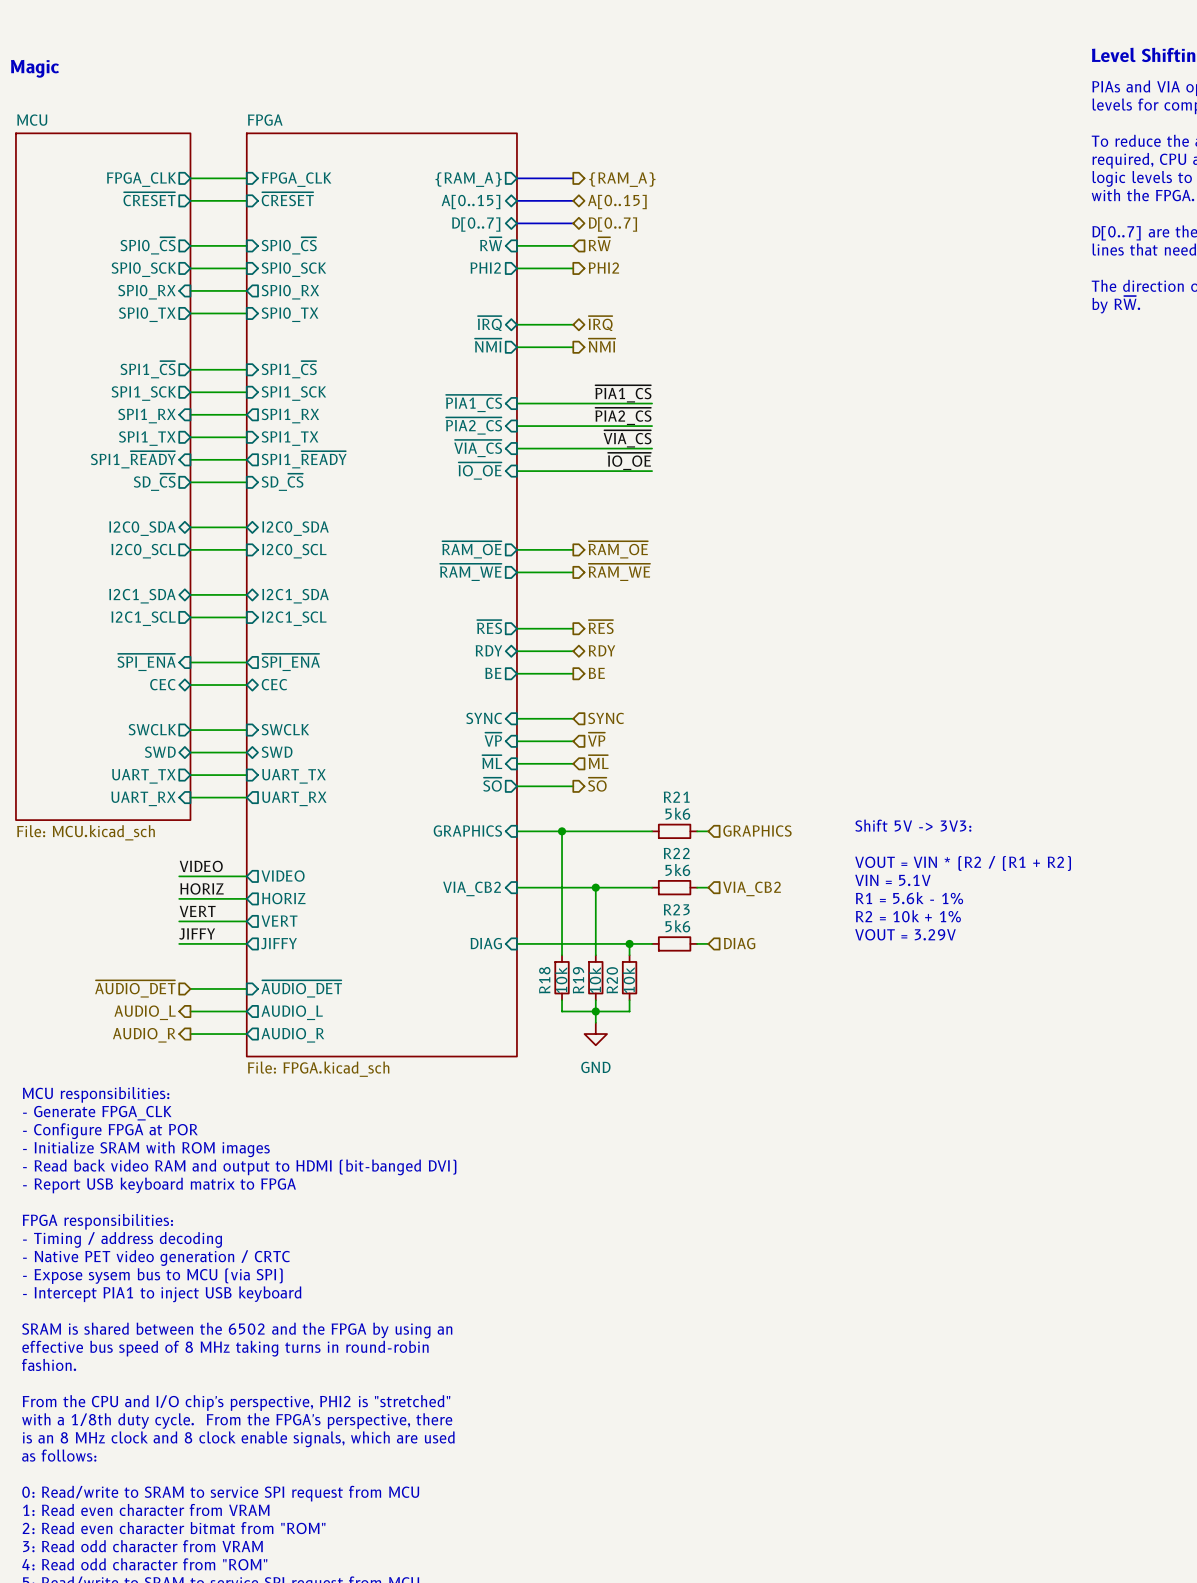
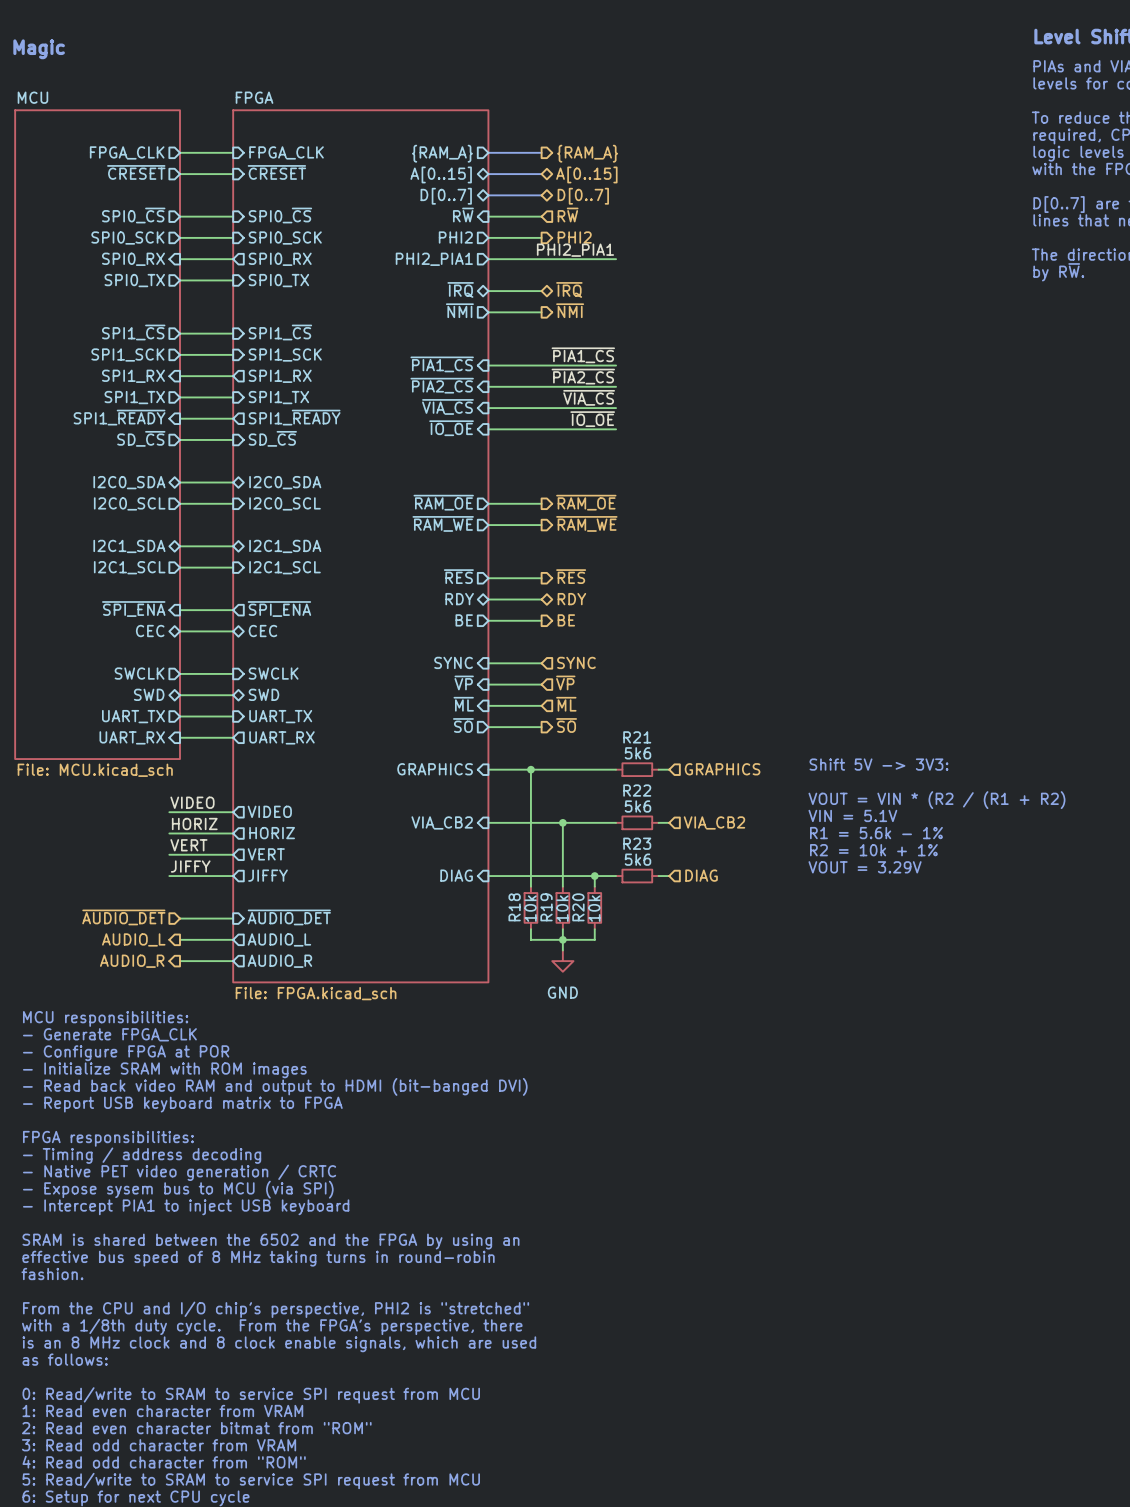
label: none -> PHI2_PIA1 (575, 250)
wire: none -> (488, 259) (616, 259)
sheet pin: none -> PHI2_PIA1 (434, 259)

